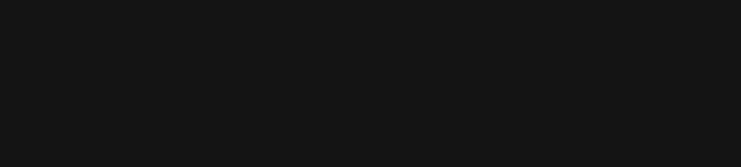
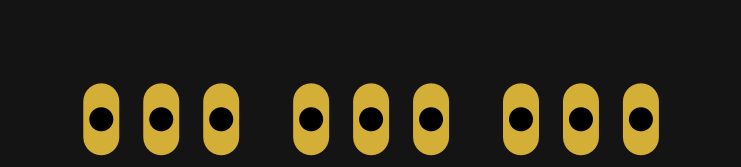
part: none -> (161, 119)
part: none -> (371, 119)
part: none -> (580, 119)

